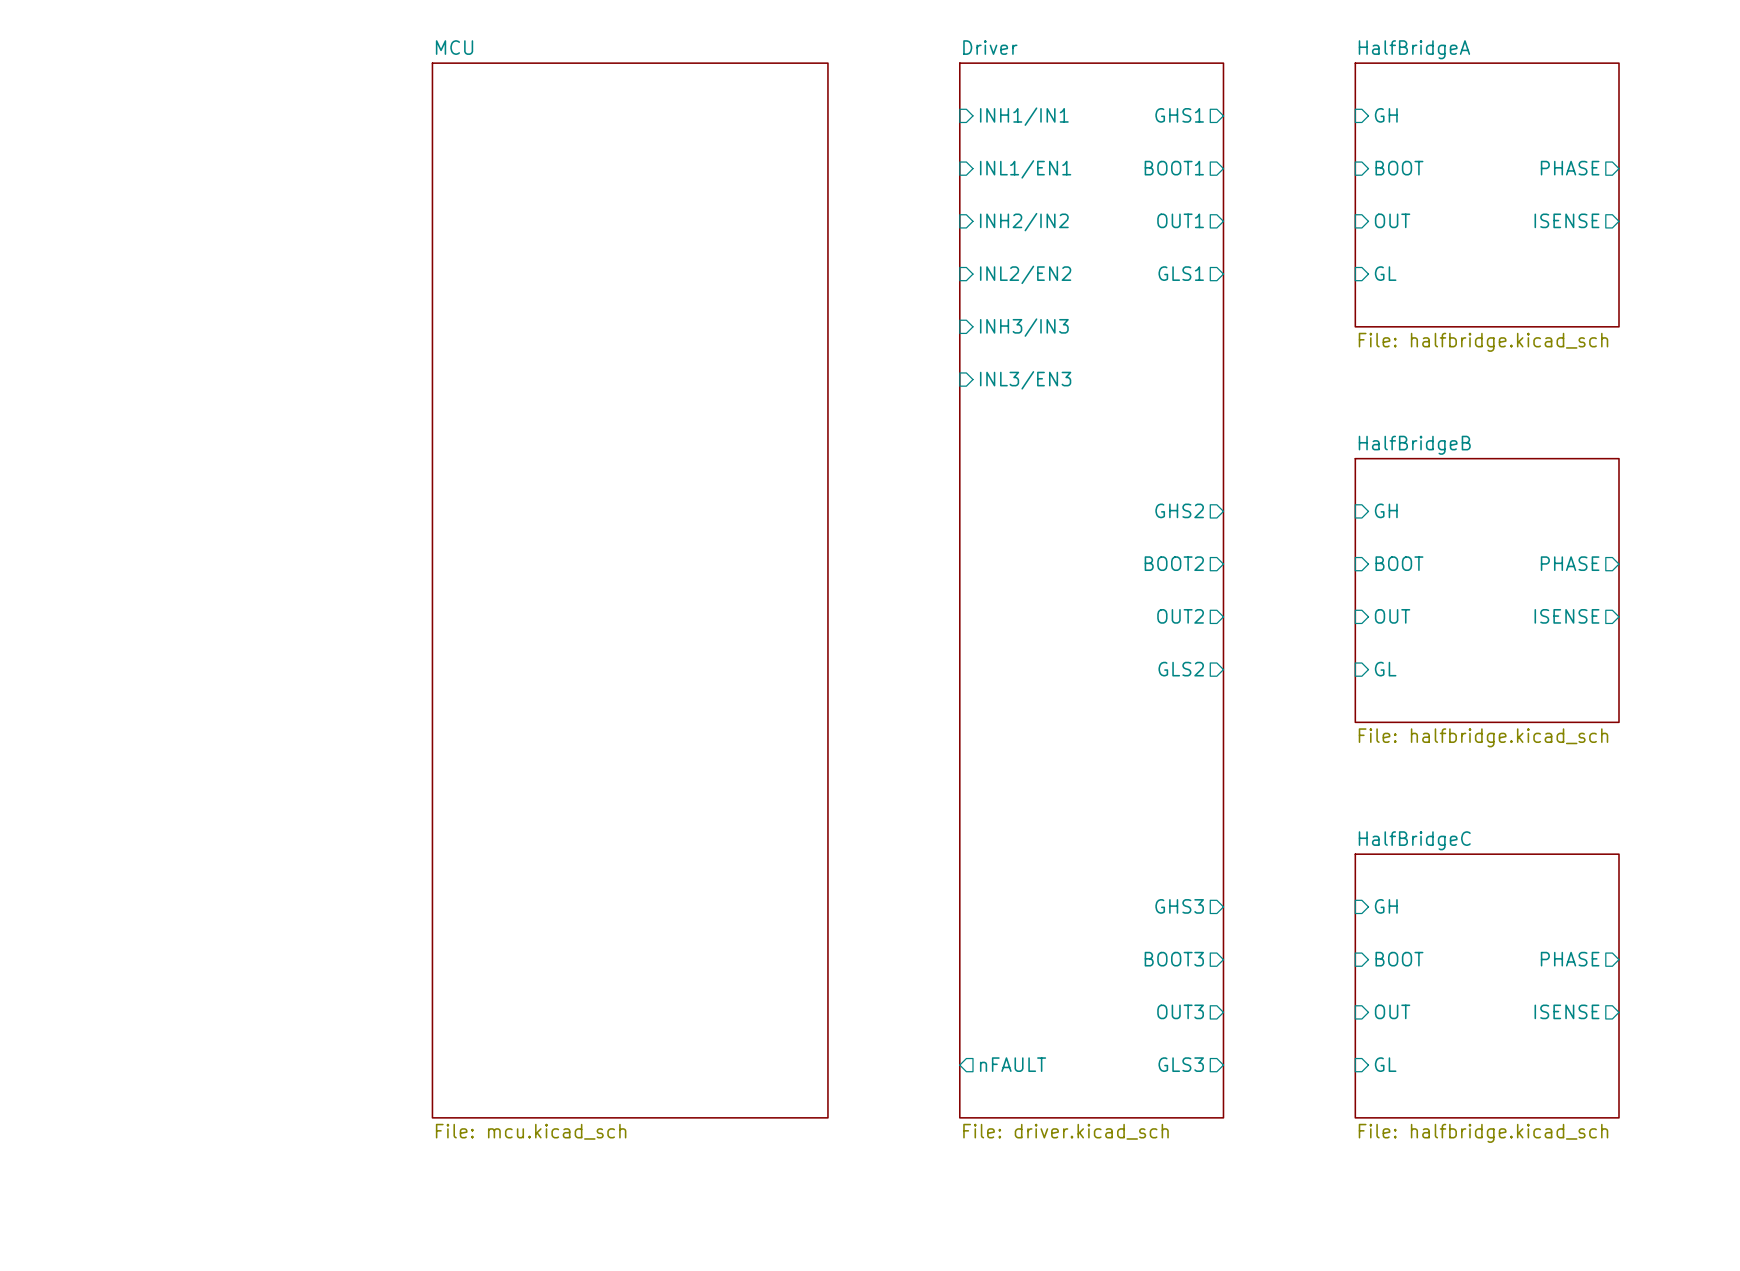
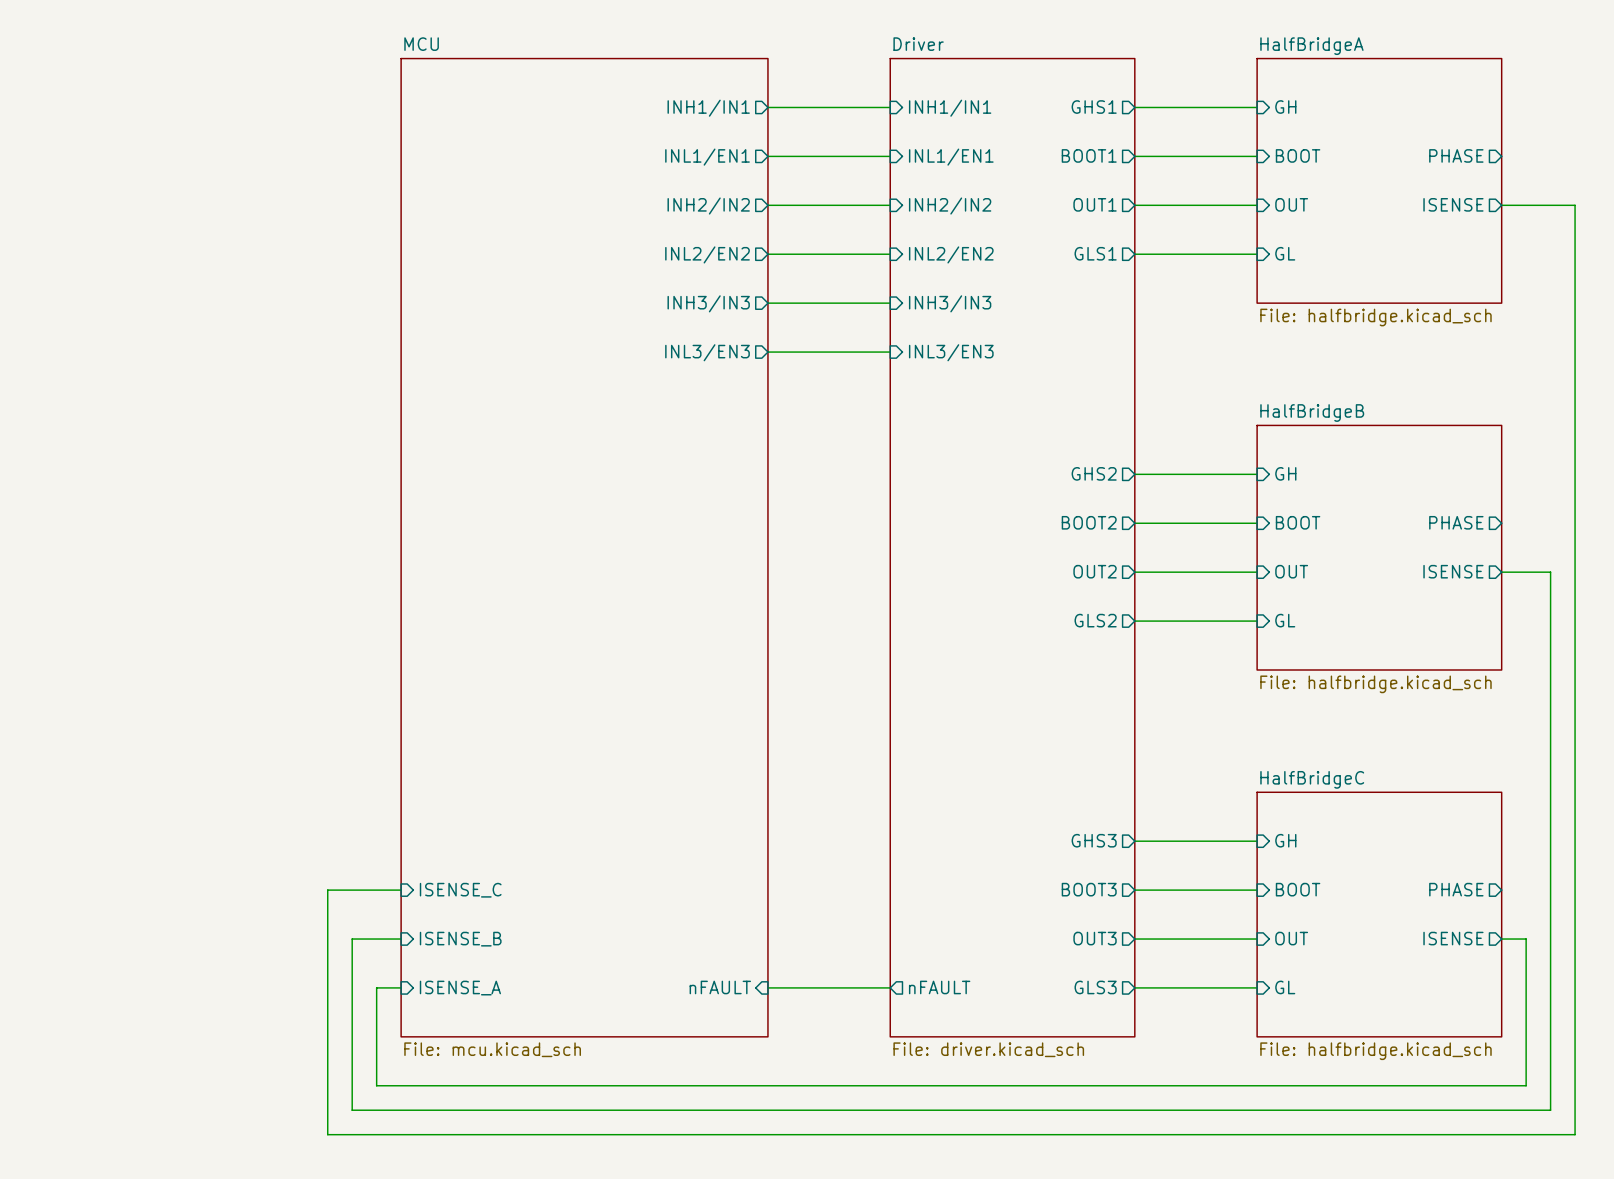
wire: none -> (767, 107) (890, 107)
wire: none -> (1134, 107) (1257, 107)
sheet pin: none -> INH1/IN1 (708, 108)
wire: none -> (767, 156) (890, 156)
wire: none -> (1134, 156) (1257, 156)
sheet pin: none -> INL1/EN1 (707, 157)
wire: none -> (767, 205) (890, 205)
wire: none -> (1134, 205) (1257, 205)
wire: none -> (1501, 205) (1575, 205) (1575, 1134) (327, 1134) (327, 890) (401, 890)
sheet pin: none -> INH2/IN2 (708, 206)
sheet pin: none -> INL2/EN2 (707, 254)
wire: none -> (767, 254) (890, 254)
wire: none -> (1134, 254) (1257, 254)
wire: none -> (767, 303) (890, 303)
sheet pin: none -> INH3/IN3 (708, 303)
wire: none -> (767, 352) (890, 352)
sheet pin: none -> INL3/EN3 (707, 352)
wire: none -> (1134, 474) (1257, 474)
wire: none -> (1134, 523) (1257, 523)
wire: none -> (1134, 572) (1257, 572)
wire: none -> (1501, 572) (1550, 572) (1550, 1110) (352, 1110) (352, 939) (401, 939)
wire: none -> (1134, 621) (1257, 621)
wire: none -> (1134, 841) (1257, 841)
sheet pin: none -> ISENSE_C (460, 890)
wire: none -> (1134, 890) (1257, 890)
sheet pin: none -> ISENSE_B (460, 939)
wire: none -> (1134, 939) (1257, 939)
wire: none -> (1501, 939) (1526, 939) (1526, 1085) (376, 1085) (376, 987) (401, 987)
sheet pin: none -> nFAULT (720, 987)
sheet pin: none -> ISENSE_A (460, 988)
wire: none -> (767, 987) (890, 987)
wire: none -> (1134, 987) (1257, 987)

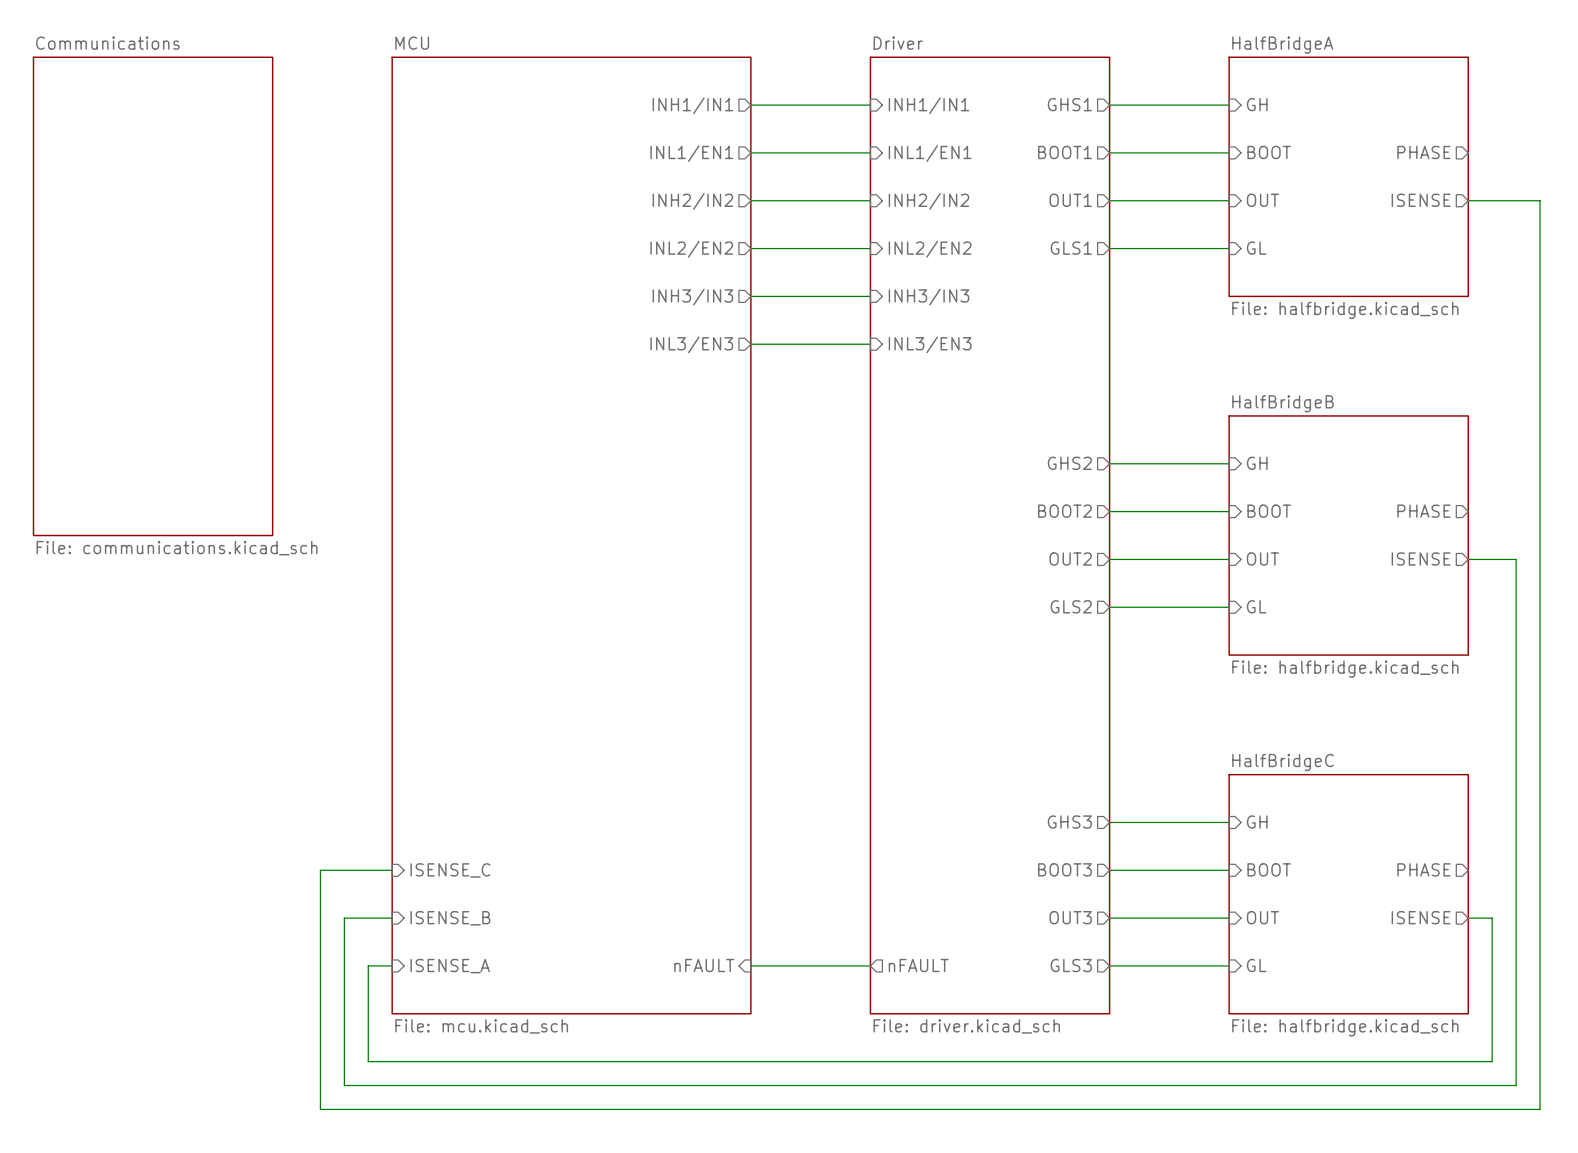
sheet Communications: none -> File: communications.kicad_sch (153, 296)

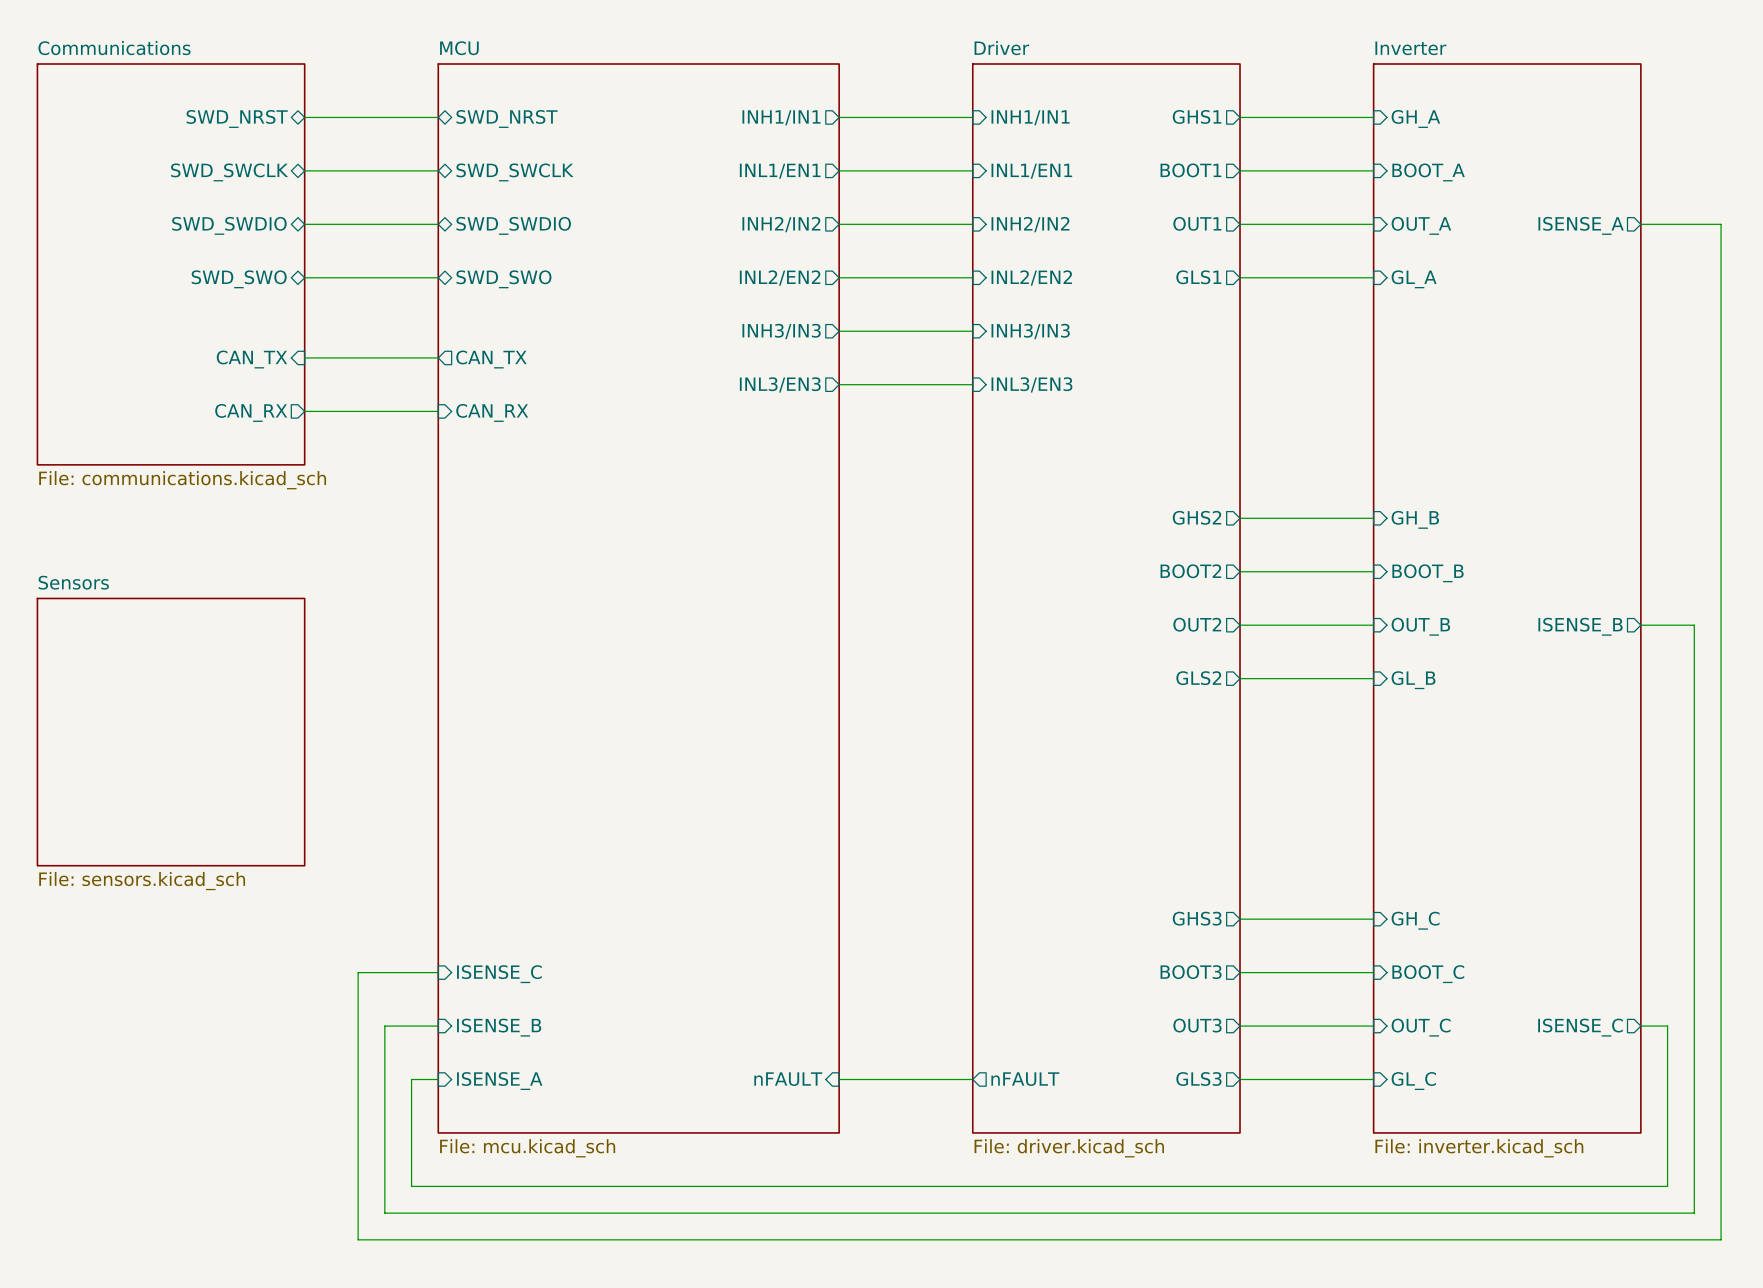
sheet pin: GH (1257, 104) -> GH_A (1415, 118)
sheet pin: none -> SWD_NRST (237, 118)
wire: none -> (304, 117) (438, 117)
sheet pin: none -> SWD_NRST (507, 118)
wire: none -> (304, 170) (438, 170)
sheet pin: BOOT (1269, 152) -> BOOT_A (1428, 172)
sheet pin: PHASE (1423, 152) -> none
sheet pin: none -> SWD_SWCLK (229, 172)
sheet pin: none -> SWD_SWCLK (514, 172)
sheet HalfBridgeA: File: halfbridge.kicad_sch (1348, 176) -> none
sheet pin: none -> SWD_SWDIO (229, 225)
wire: none -> (304, 224) (438, 224)
sheet pin: none -> SWD_SWDIO (513, 225)
sheet pin: OUT (1262, 200) -> OUT_A (1421, 225)
sheet pin: ISENSE (1421, 200) -> ISENSE_A (1581, 225)
sheet Communications: none -> File: communications.kicad_sch (171, 264)
sheet pin: none -> SWD_SWO (239, 279)
wire: none -> (304, 277) (438, 277)
sheet pin: none -> SWD_SWO (503, 279)
sheet pin: GL (1256, 248) -> GL_A (1414, 279)
sheet Communications: File: communications.kicad_sch (153, 296) -> none
sheet pin: none -> CAN_TX (251, 359)
wire: none -> (304, 357) (438, 357)
sheet pin: none -> CAN_TX (491, 359)
sheet pin: none -> CAN_RX (251, 412)
wire: none -> (304, 411) (438, 411)
sheet pin: none -> CAN_RX (492, 412)
sheet pin: GH (1257, 463) -> GH_B (1415, 519)
sheet pin: BOOT (1269, 511) -> BOOT_B (1428, 573)
sheet pin: PHASE (1423, 511) -> none
sheet HalfBridgeB: File: halfbridge.kicad_sch (1348, 535) -> none
sheet Inverter: none -> File: inverter.kicad_sch (1507, 598)
sheet pin: OUT (1262, 558) -> OUT_B (1420, 626)
sheet pin: ISENSE (1421, 558) -> ISENSE_B (1580, 626)
sheet pin: GL (1256, 606) -> GL_B (1413, 680)
sheet Sensors: none -> File: sensors.kicad_sch (171, 732)
sheet pin: GH (1257, 822) -> GH_C (1415, 920)
sheet pin: BOOT (1269, 869) -> BOOT_C (1428, 974)
sheet pin: PHASE (1423, 869) -> none
sheet HalfBridgeC: File: halfbridge.kicad_sch (1348, 894) -> none
sheet pin: OUT (1262, 917) -> OUT_C (1421, 1027)
sheet pin: ISENSE (1421, 917) -> ISENSE_C (1580, 1027)
sheet pin: GL (1256, 965) -> GL_C (1413, 1081)

